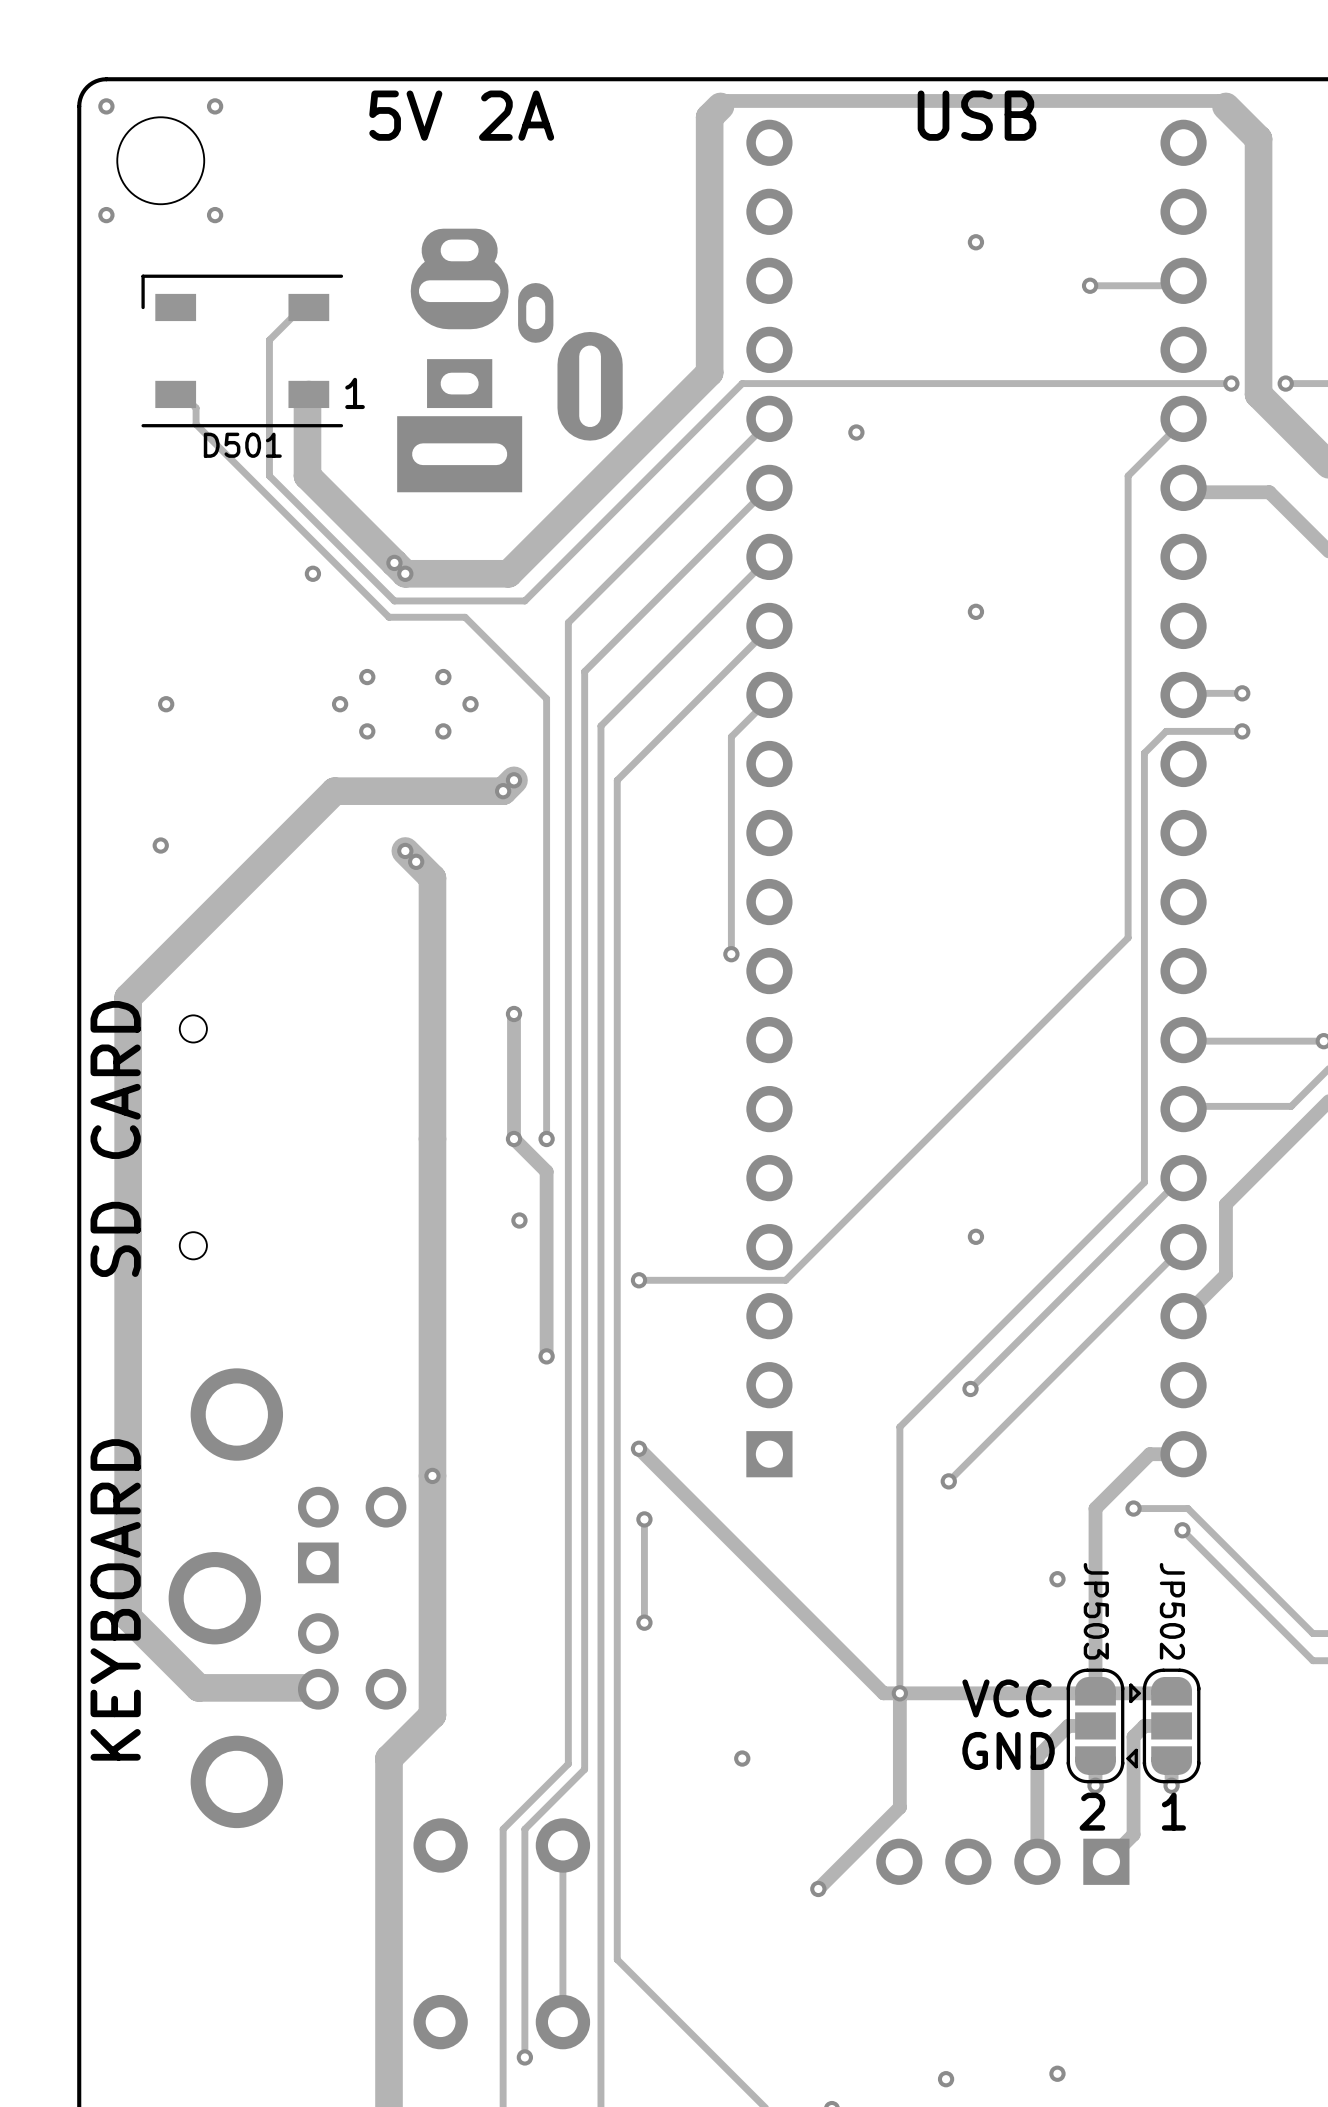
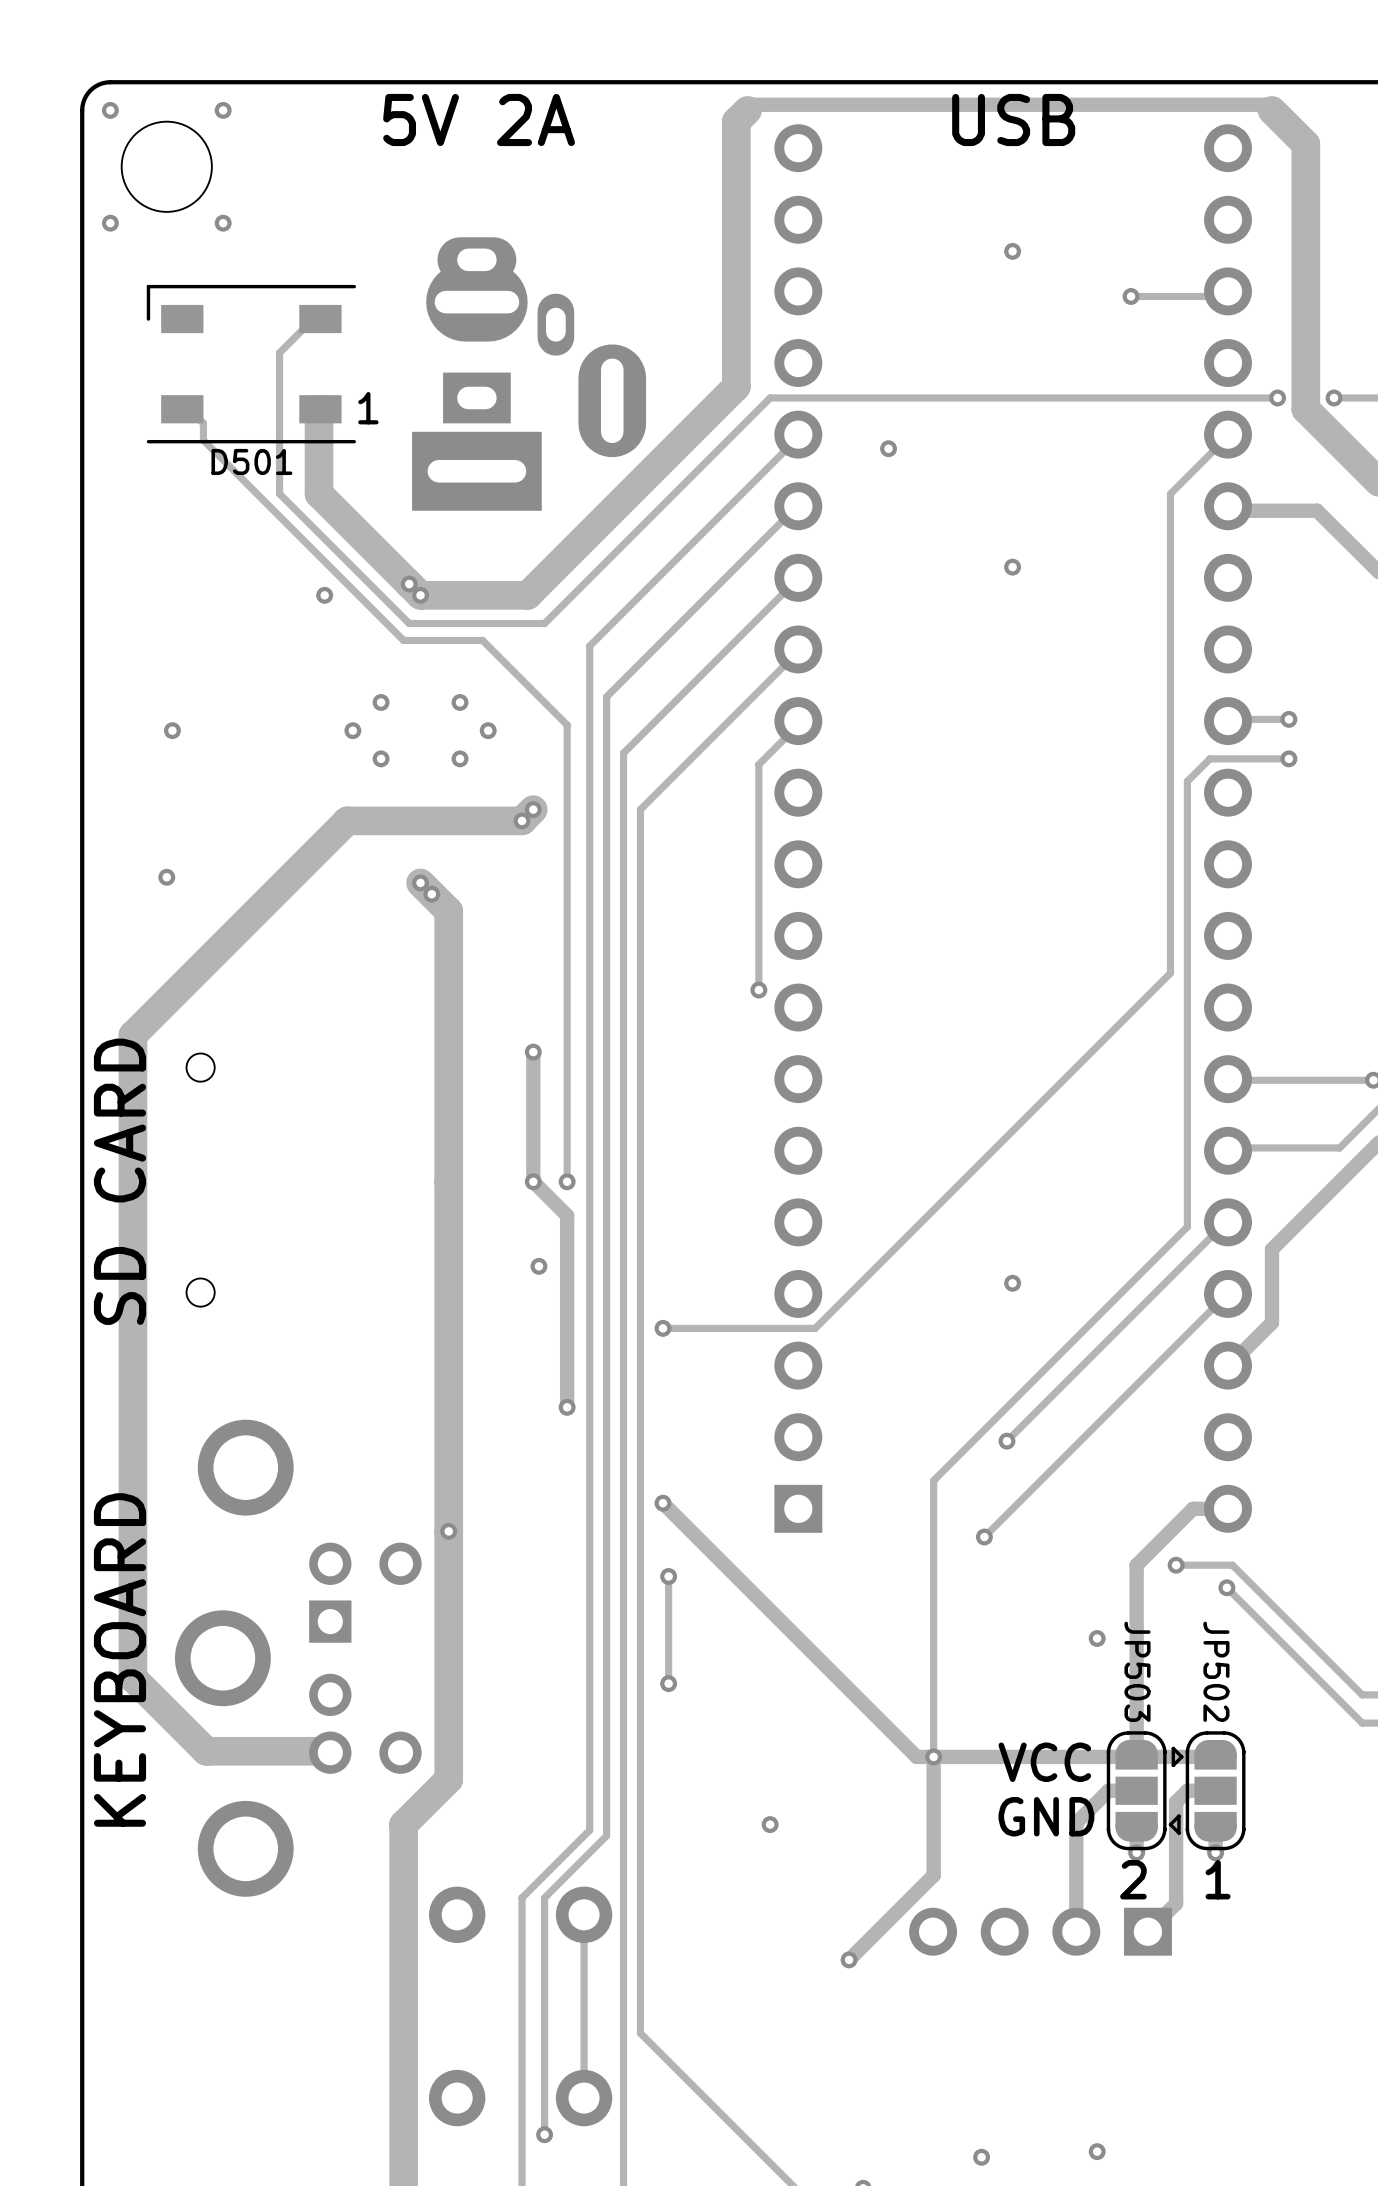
via position: (975, 611) -> (1012, 567)

